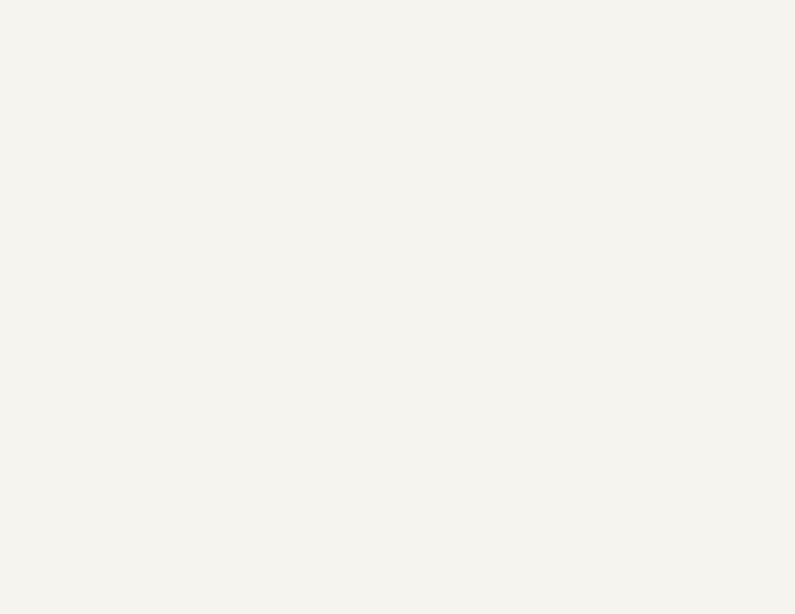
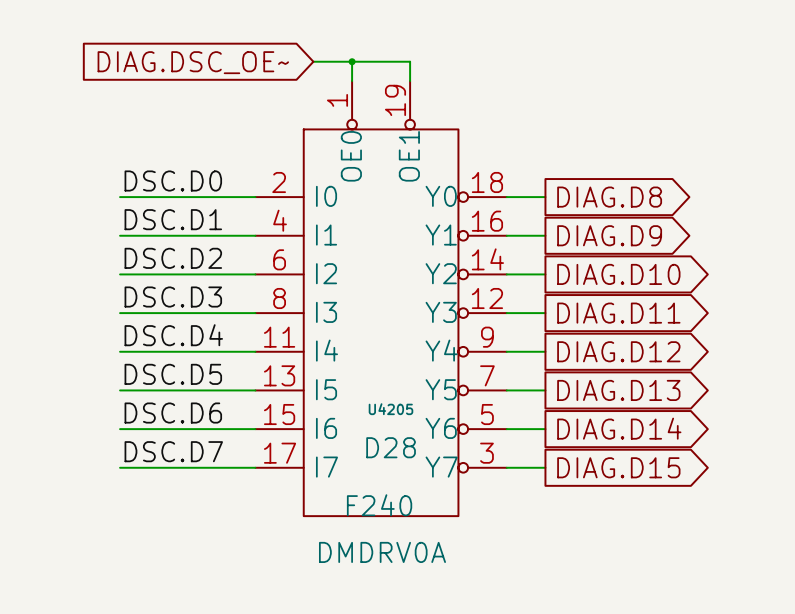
wire: none -> (313, 61) (410, 61) (410, 81)
wire: none -> (352, 61) (352, 81)
junction: none -> (352, 61)
global label: none -> DIAG.DSC_OE~ (193, 62)
label: none -> DSC.D0 (173, 180)
wire: none -> (120, 197) (255, 197)
wire: none -> (506, 197) (545, 197)
global label: none -> DIAG.D8 (609, 197)
label: none -> DSC.D1 (173, 219)
wire: none -> (120, 235) (255, 235)
wire: none -> (506, 235) (545, 235)
global label: none -> DIAG.D9 (609, 235)
label: none -> DSC.D2 (173, 258)
wire: none -> (120, 274) (255, 274)
wire: none -> (506, 274) (545, 274)
global label: none -> DIAG.D10 (618, 274)
label: none -> DSC.D3 (173, 297)
U4205: none -> F240 (381, 298)
wire: none -> (120, 313) (255, 313)
wire: none -> (506, 313) (545, 313)
global label: none -> DIAG.D11 (618, 313)
label: none -> DSC.D4 (173, 335)
wire: none -> (120, 351) (255, 351)
wire: none -> (506, 351) (545, 351)
global label: none -> DIAG.D12 (618, 351)
label: none -> DSC.D5 (173, 374)
wire: none -> (120, 390) (255, 390)
wire: none -> (506, 390) (545, 390)
global label: none -> DIAG.D13 (618, 390)
label: none -> DSC.D6 (173, 413)
global label: none -> DIAG.D14 (619, 428)
wire: none -> (120, 429) (255, 429)
wire: none -> (506, 429) (545, 429)
label: none -> DSC.D7 (173, 451)
wire: none -> (120, 467) (255, 467)
wire: none -> (506, 467) (545, 467)
global label: none -> DIAG.D15 (618, 467)

